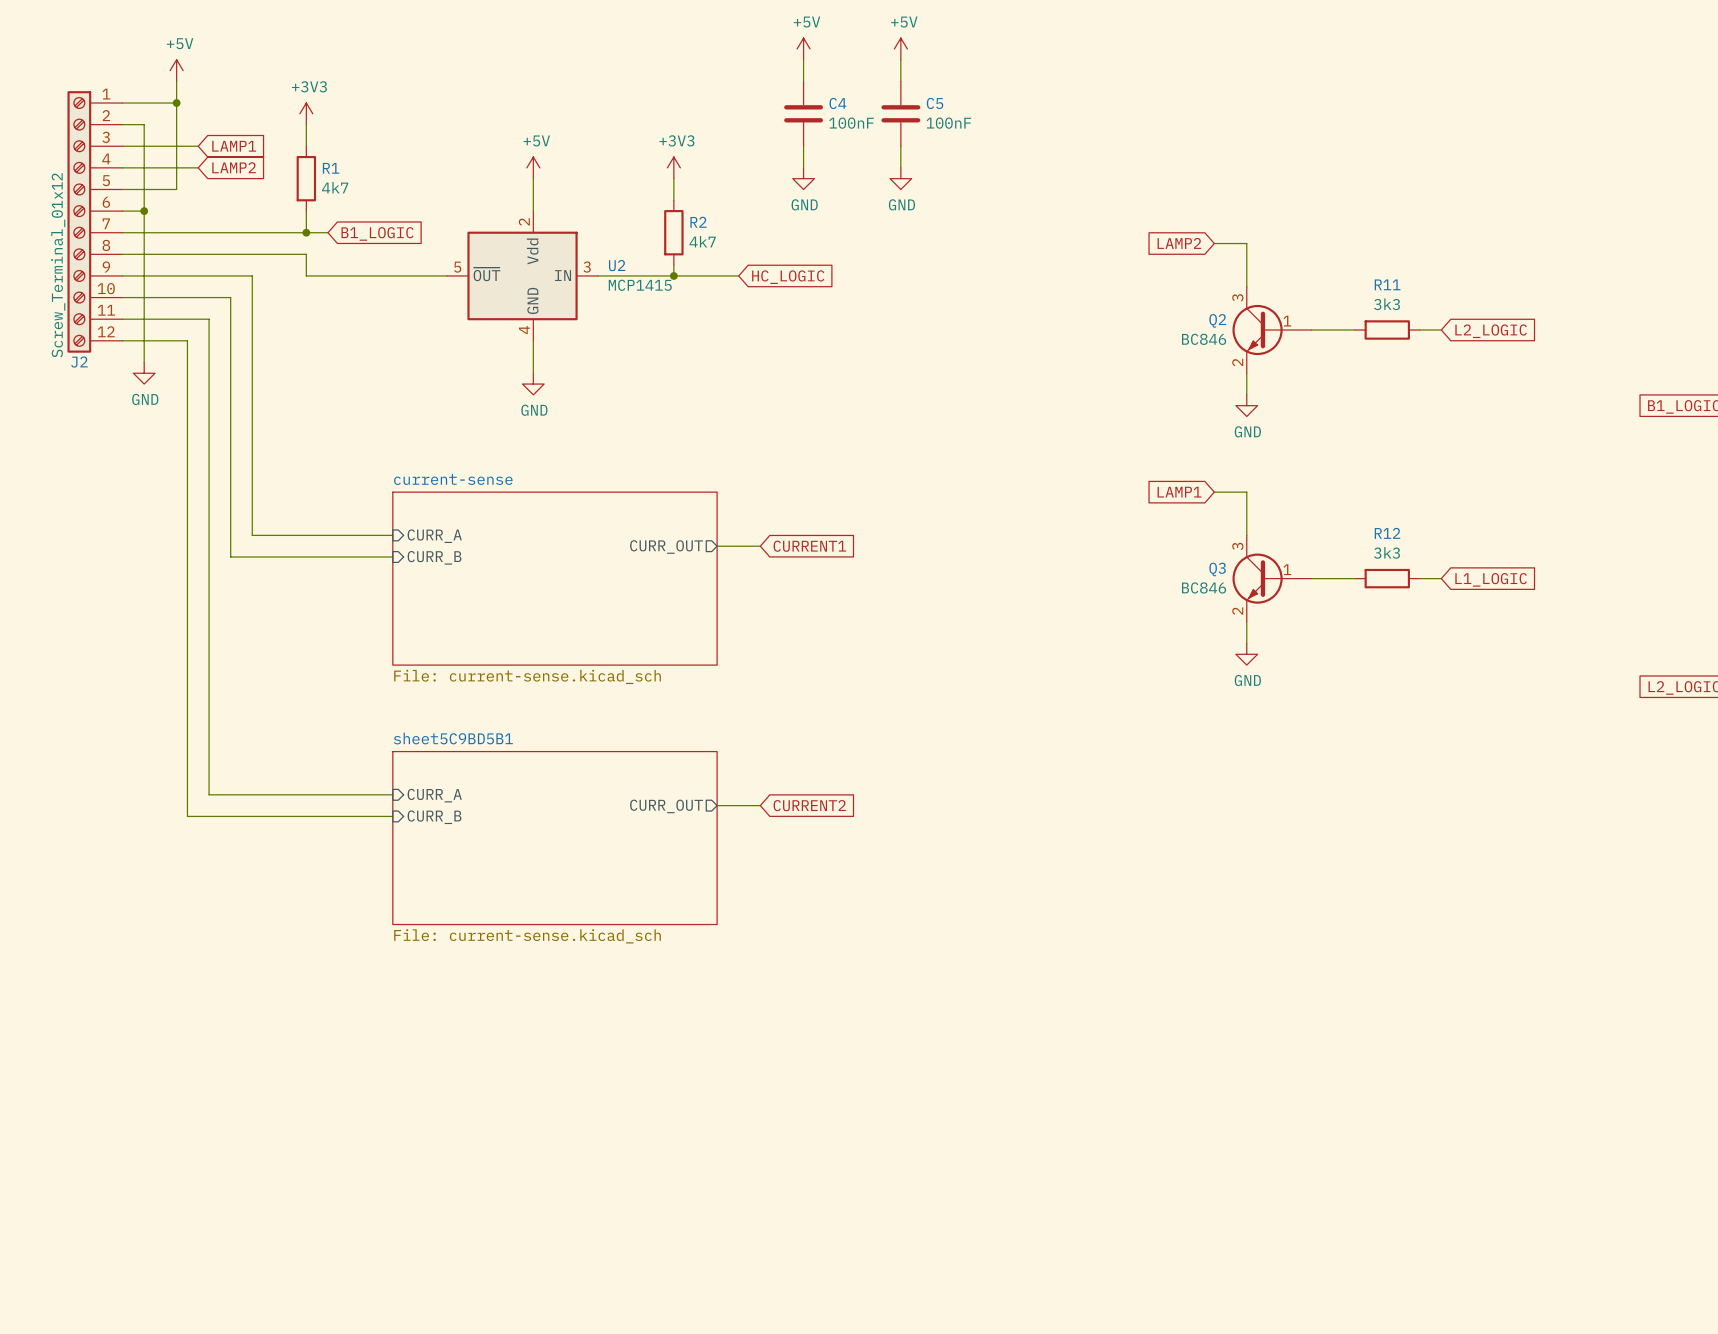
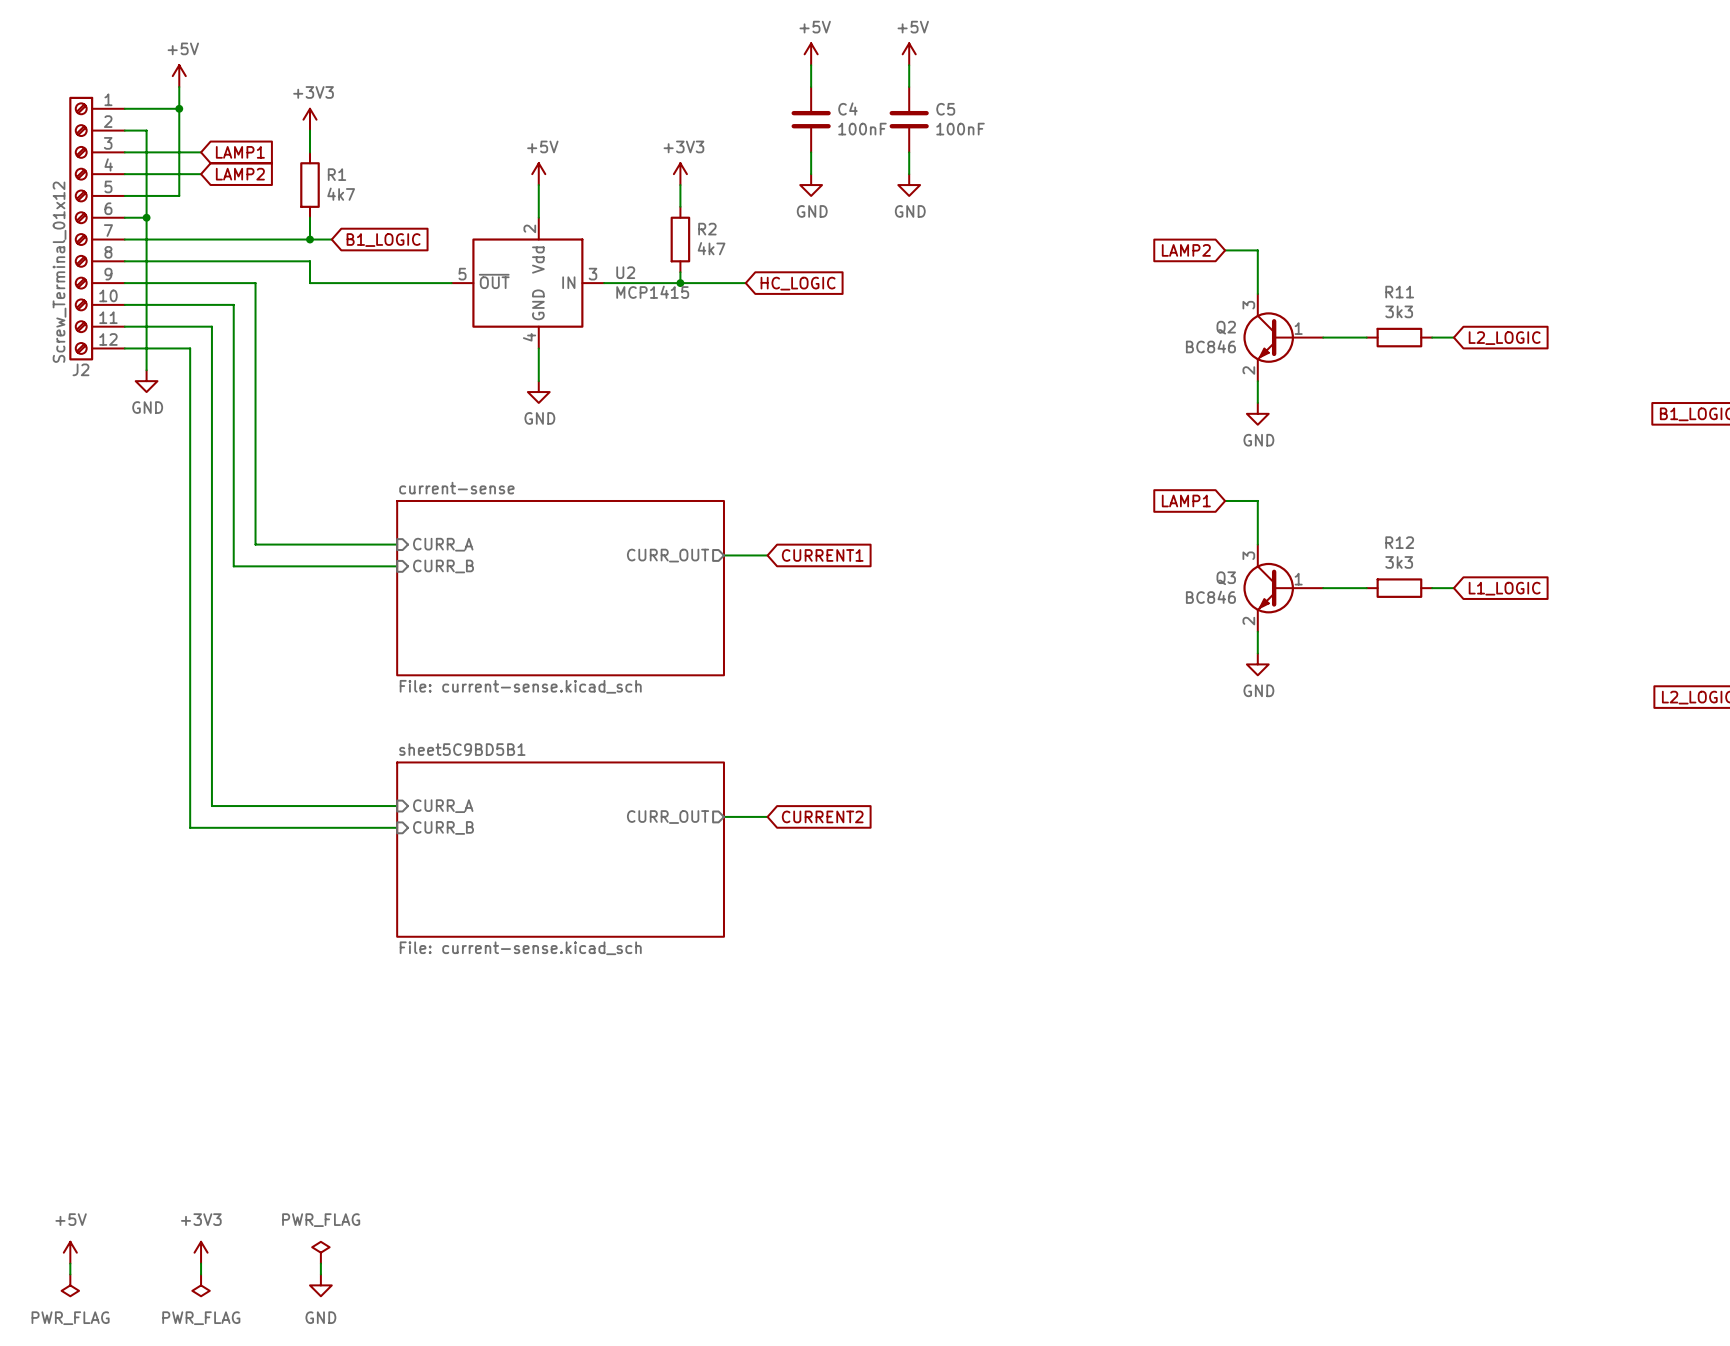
power symbol: none -> +5V (70, 1252)
power symbol: none -> +3V3 (201, 1252)
power symbol: none -> PWR_FLAG (320, 1252)
wire: none -> (70, 1263) (70, 1274)
wire: none -> (201, 1263) (201, 1274)
wire: none -> (320, 1263) (320, 1274)
power symbol: none -> PWR_FLAG (70, 1285)
power symbol: none -> PWR_FLAG (201, 1285)
power symbol: none -> GND (320, 1285)

